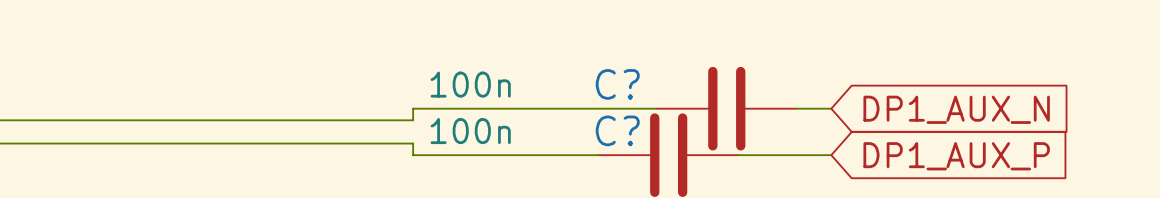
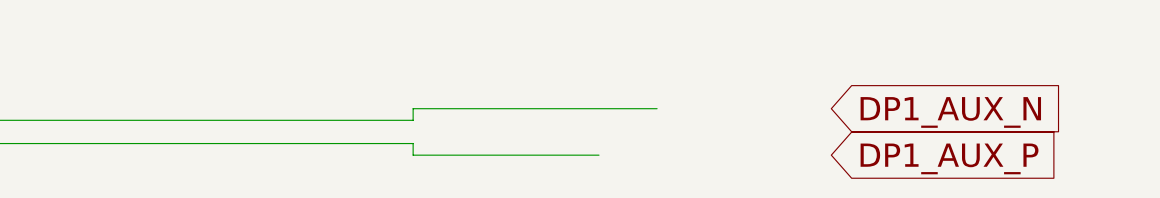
C?: (726, 108) -> none
wire: (796, 108) (831, 108) -> none
C?: (668, 155) -> none
wire: (738, 155) (831, 155) -> none

